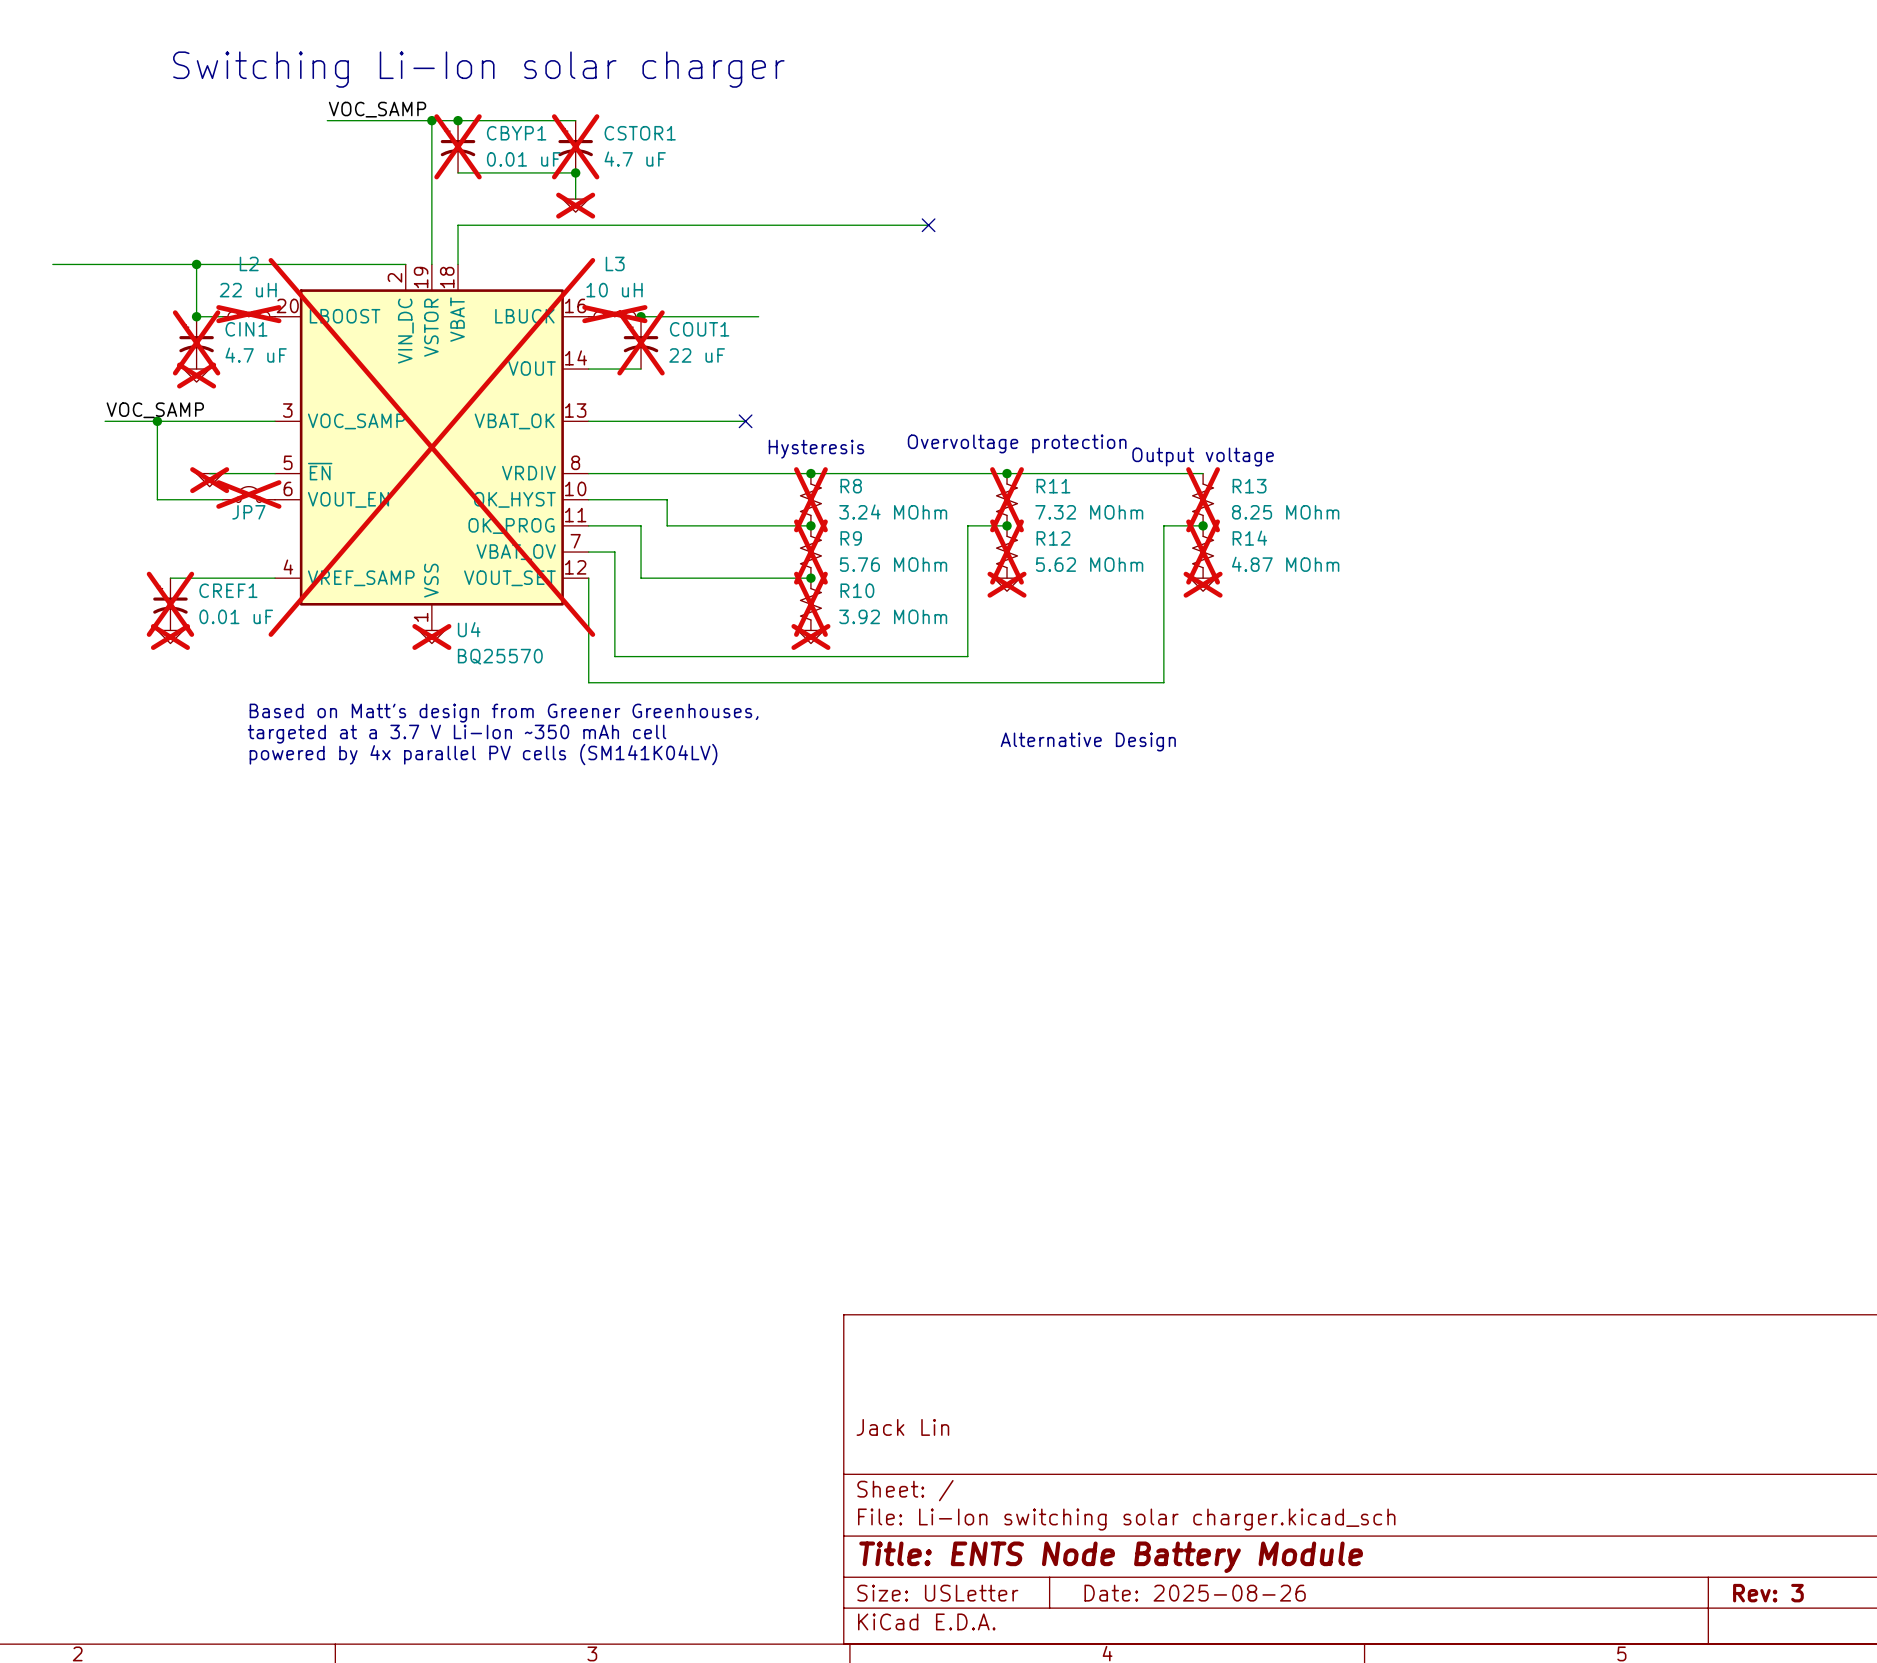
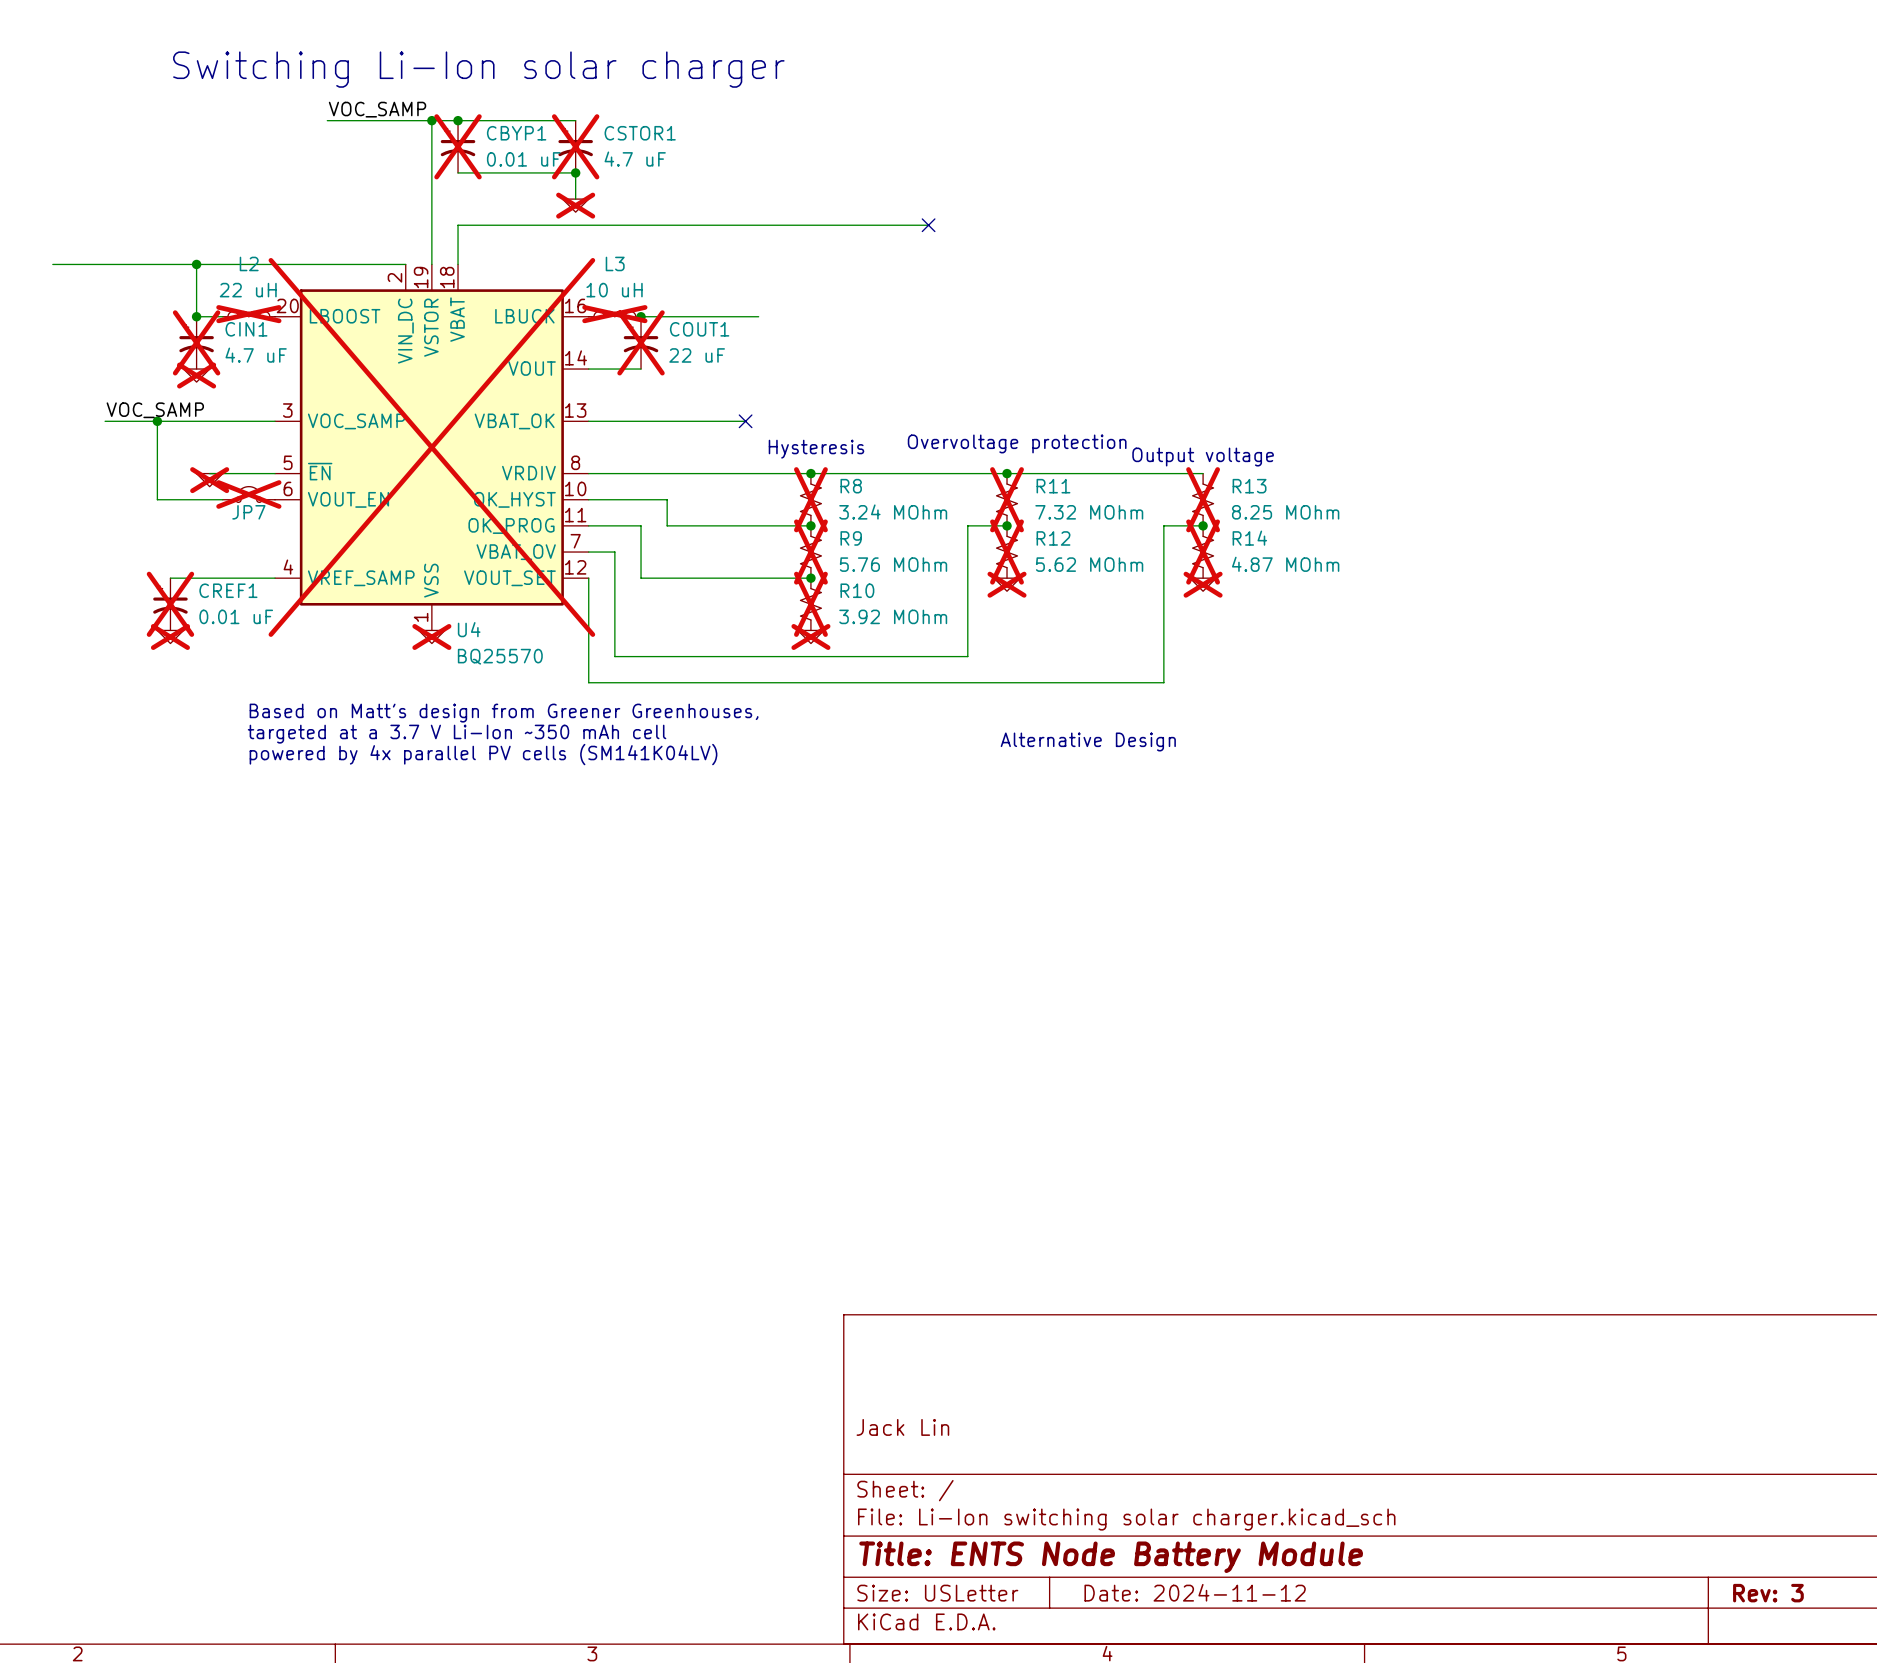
title block: Date: 2025-08-26 (1195, 1593) -> Date: 2024-11-12 (1195, 1592)

